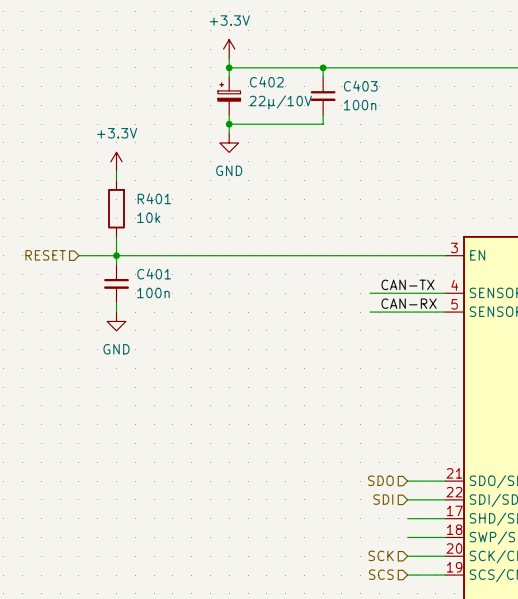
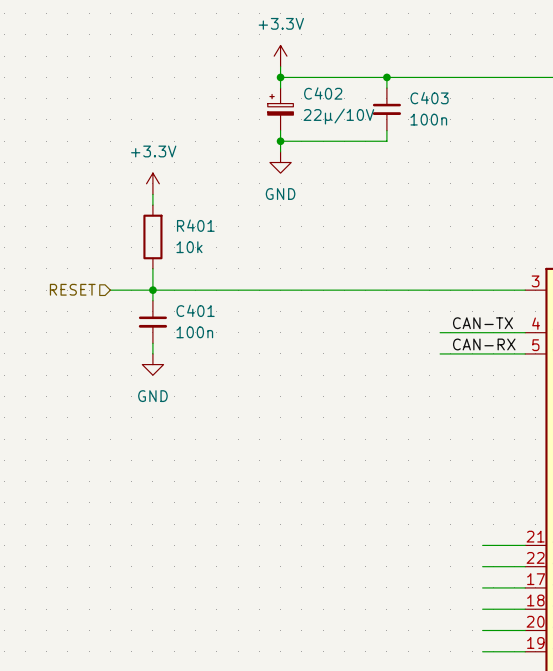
hierarchical label: SDO (380, 480) -> none
hierarchical label: SDI (383, 499) -> none
hierarchical label: SCK (381, 555) -> none
hierarchical label: SCS (381, 574) -> none

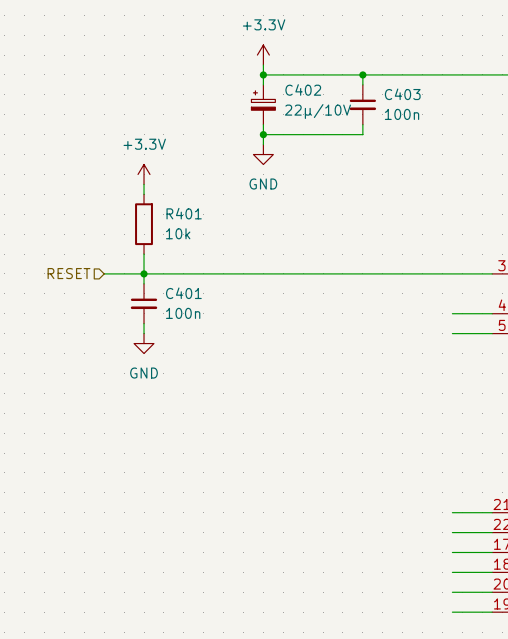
label: CAN-TX (482, 323) -> none
wire: (440, 332) (482, 332) -> none
label: CAN-RX (484, 344) -> none
wire: (440, 353) (482, 353) -> none

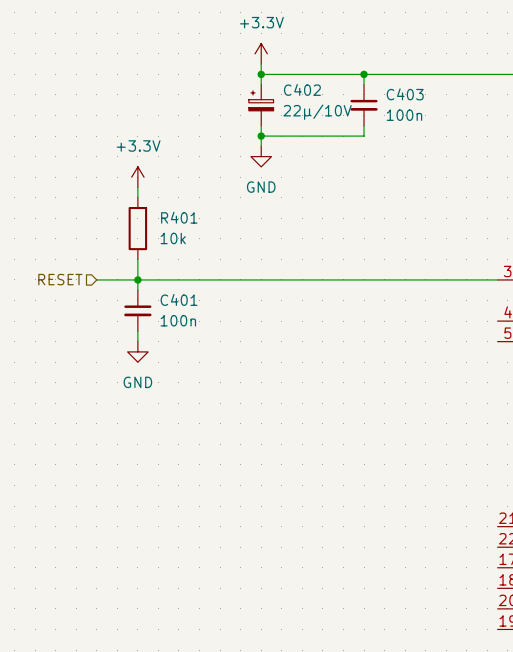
wire: (452, 313) (492, 313) -> none
wire: (452, 333) (492, 333) -> none
wire: (452, 512) (492, 512) -> none
wire: (452, 532) (492, 532) -> none
wire: (452, 552) (492, 552) -> none
wire: (452, 572) (492, 572) -> none
wire: (452, 592) (492, 592) -> none
wire: (452, 612) (492, 612) -> none

